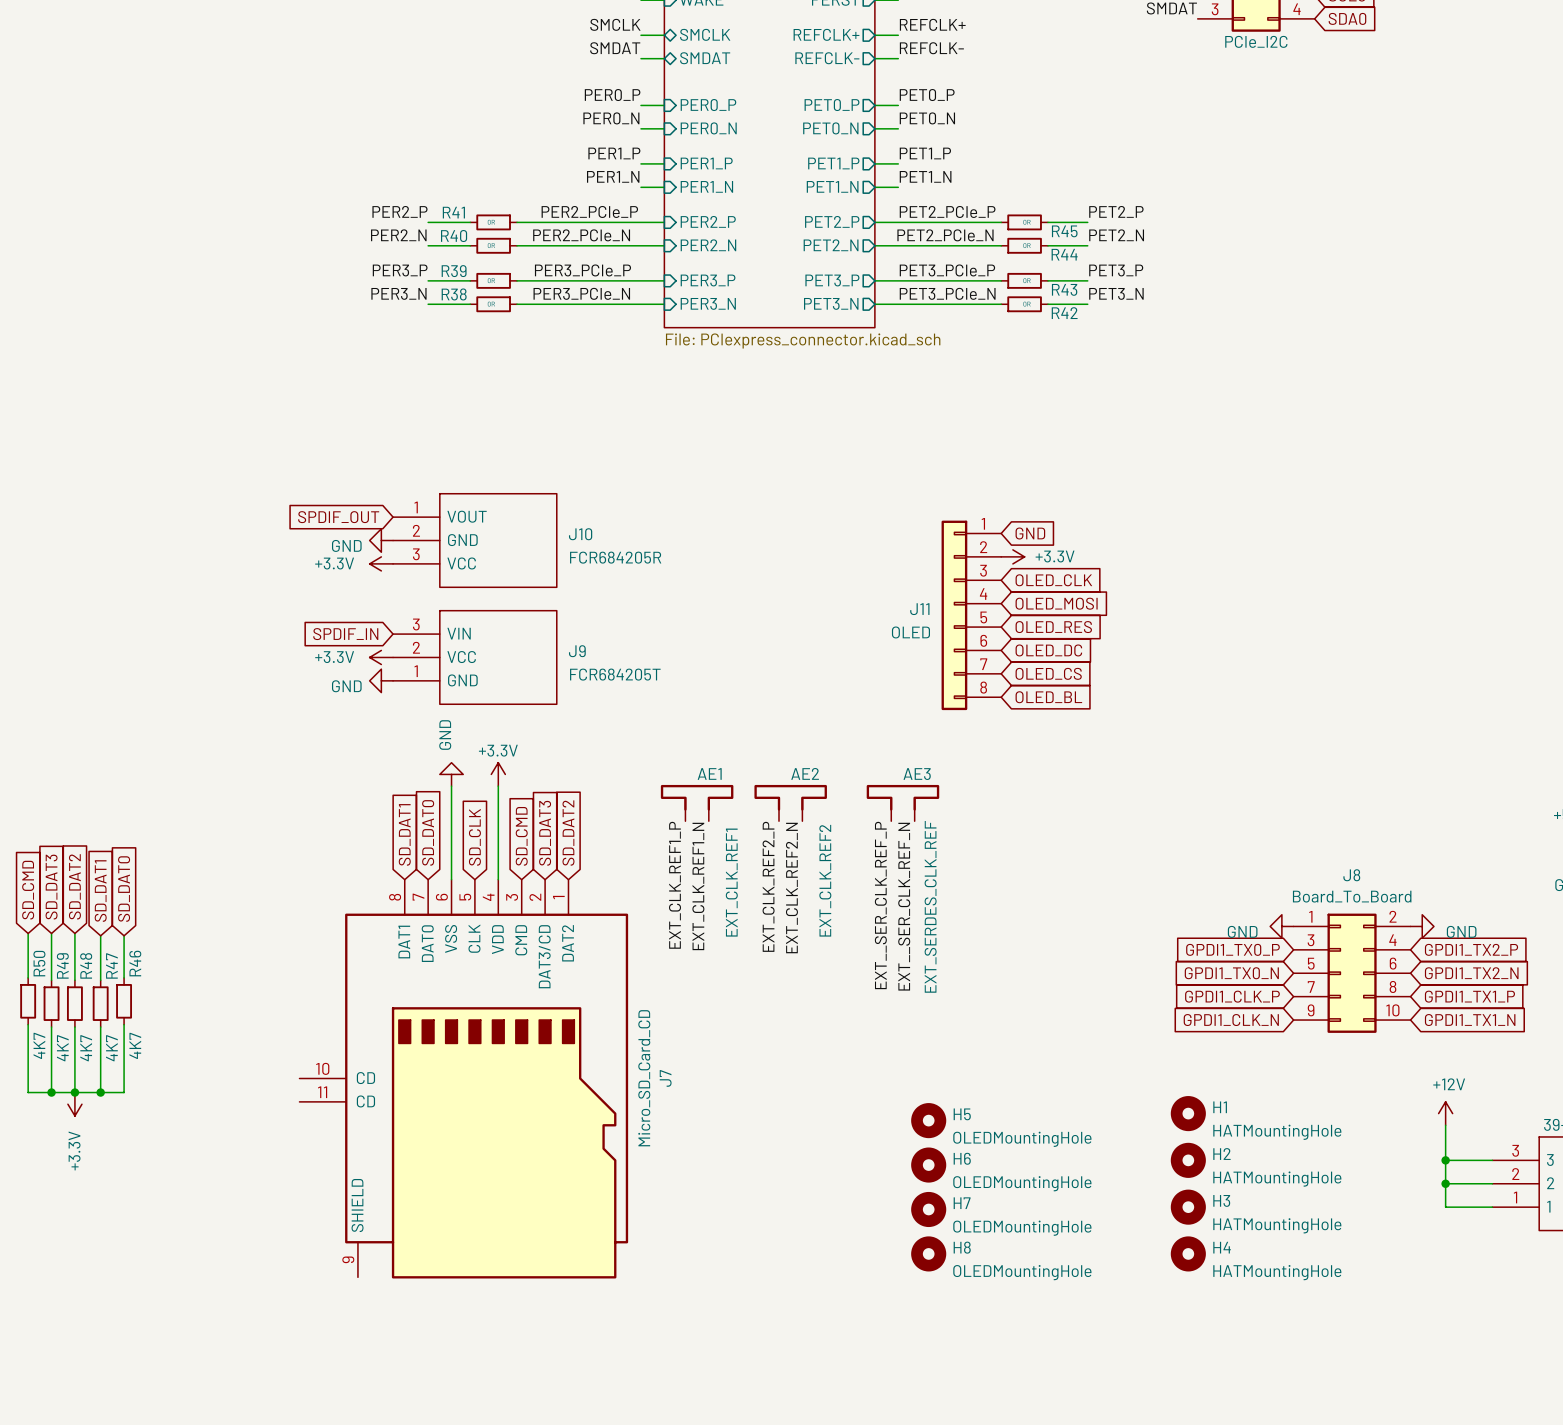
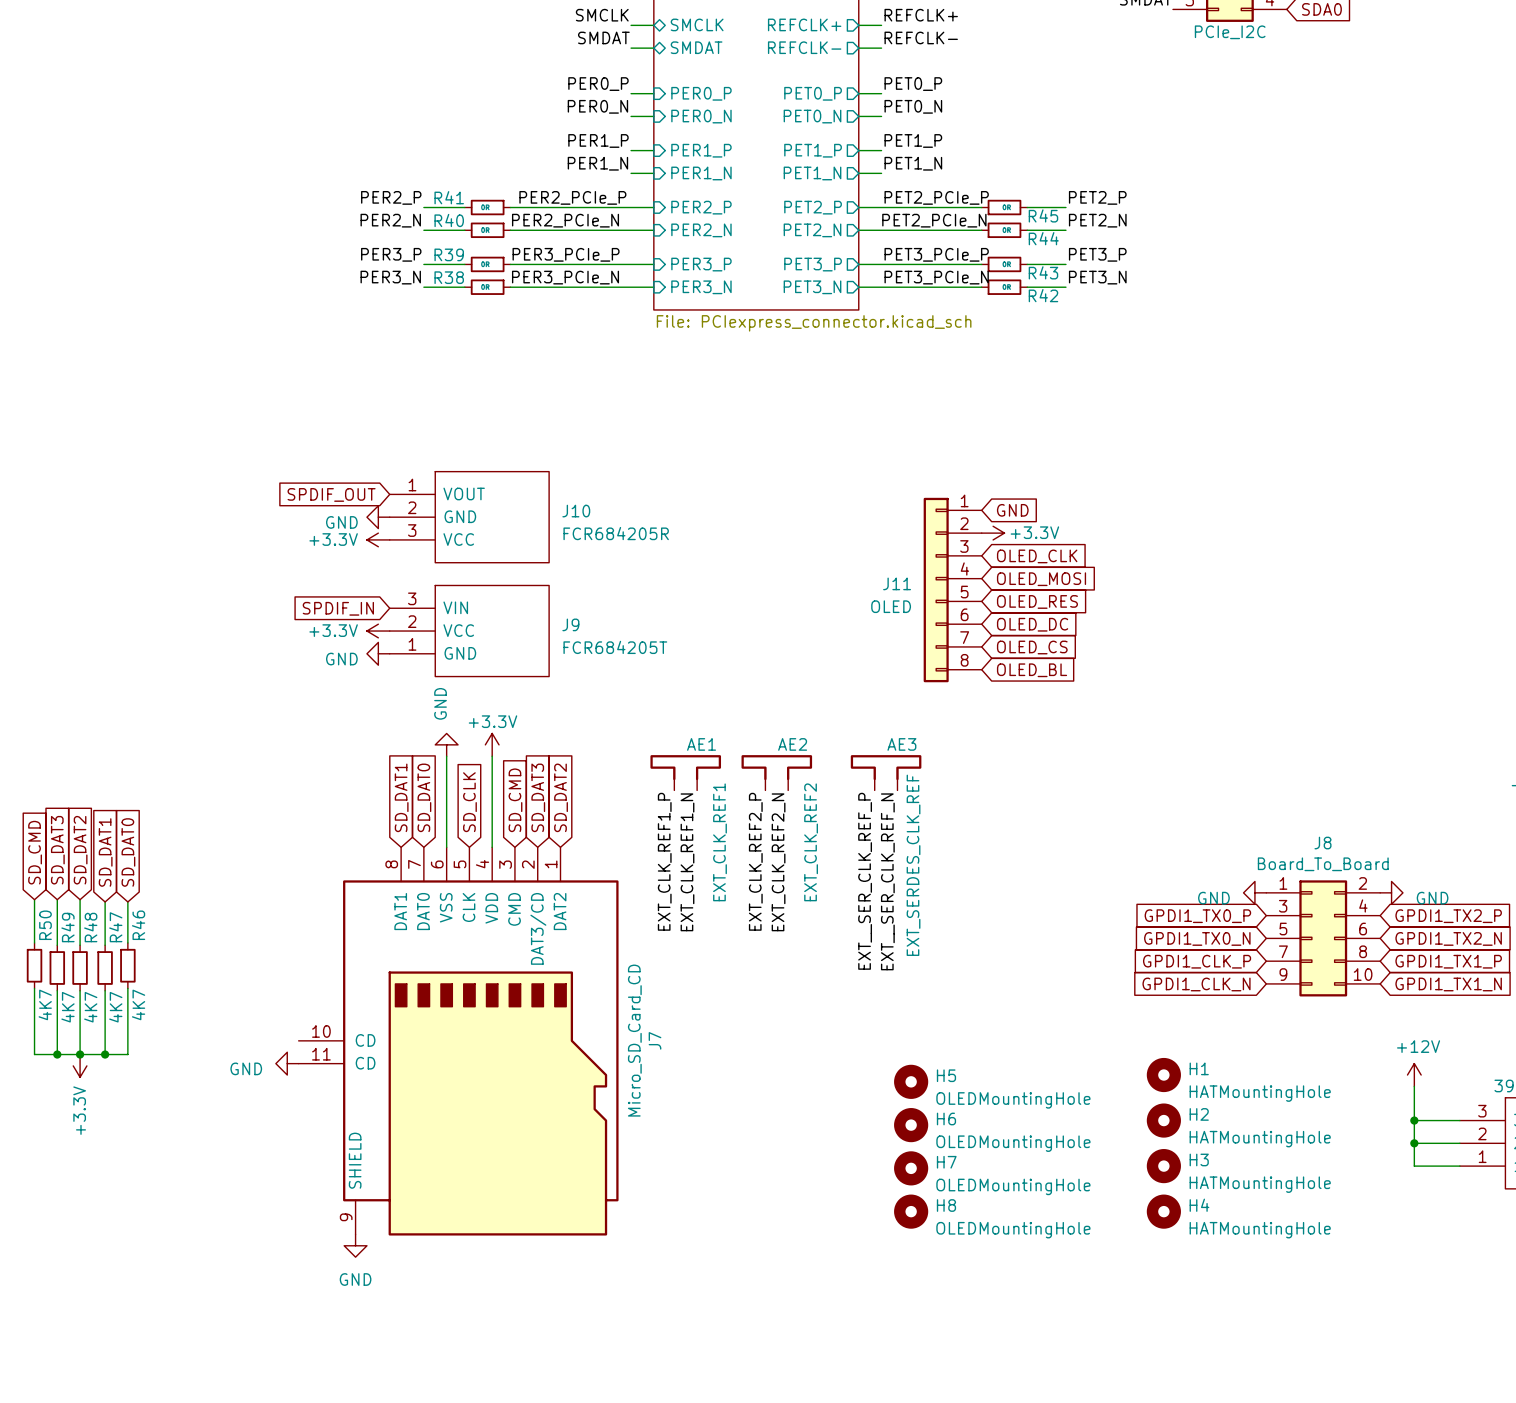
power symbol: none -> GND (287, 1063)
power symbol: none -> GND (355, 1245)

